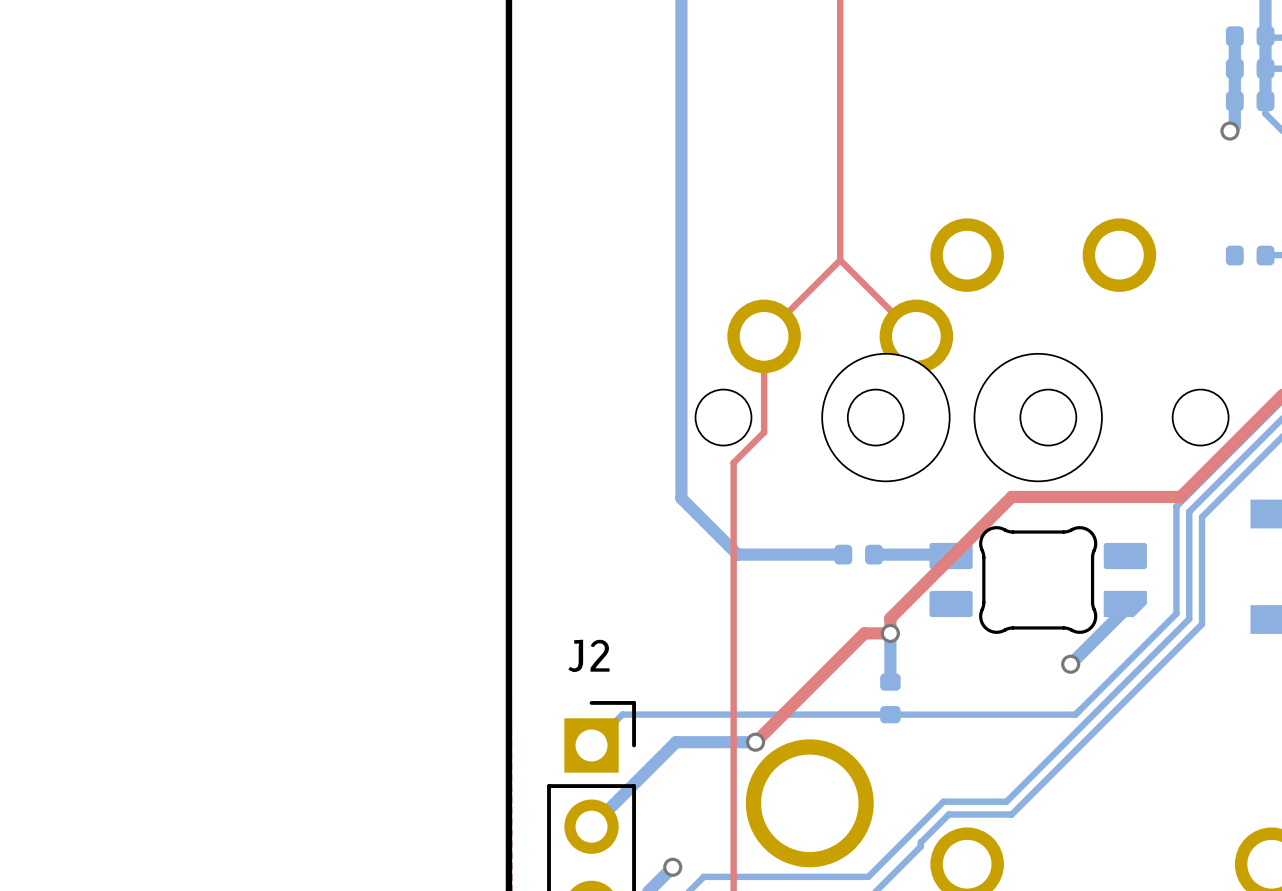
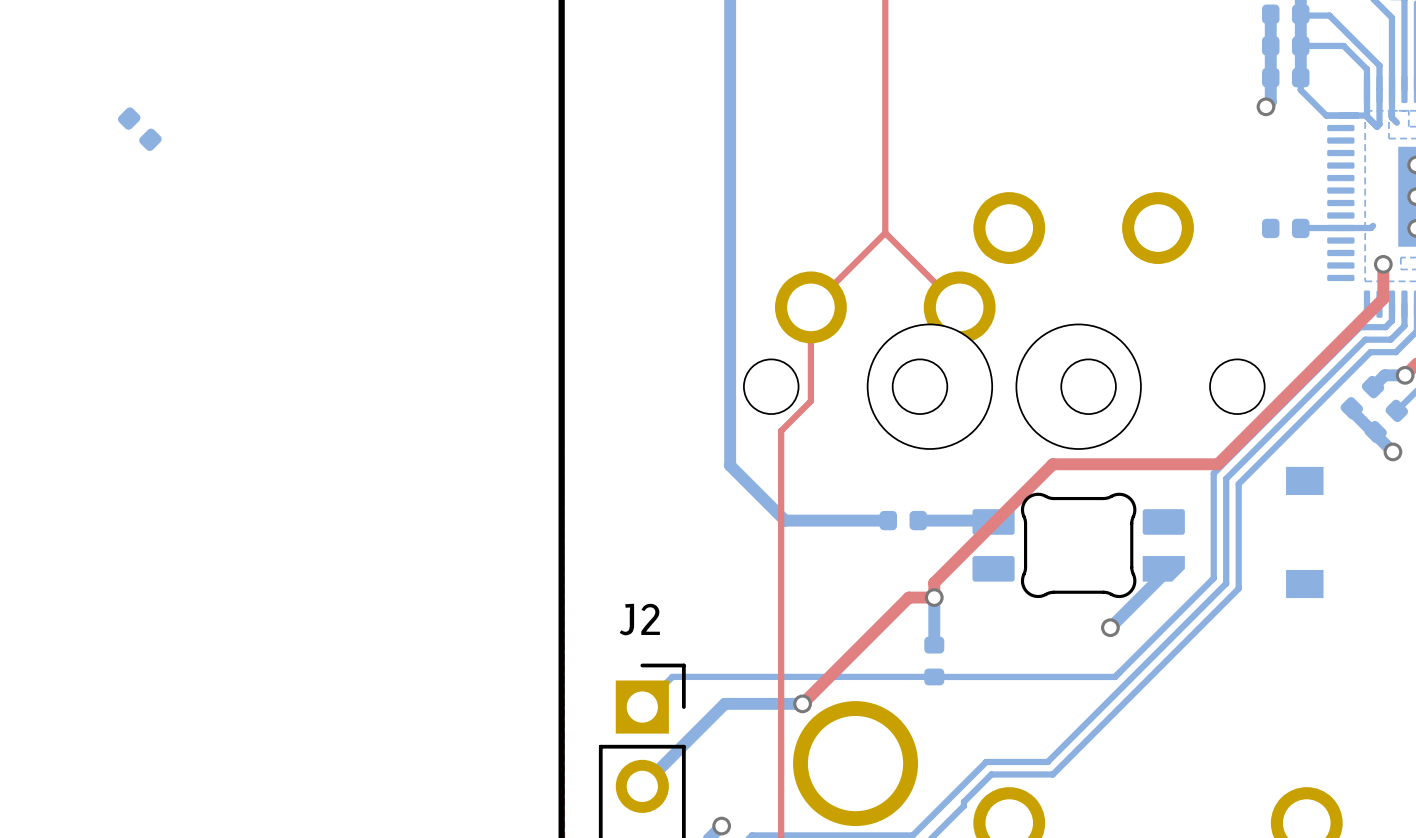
part: none -> (139, 129)

